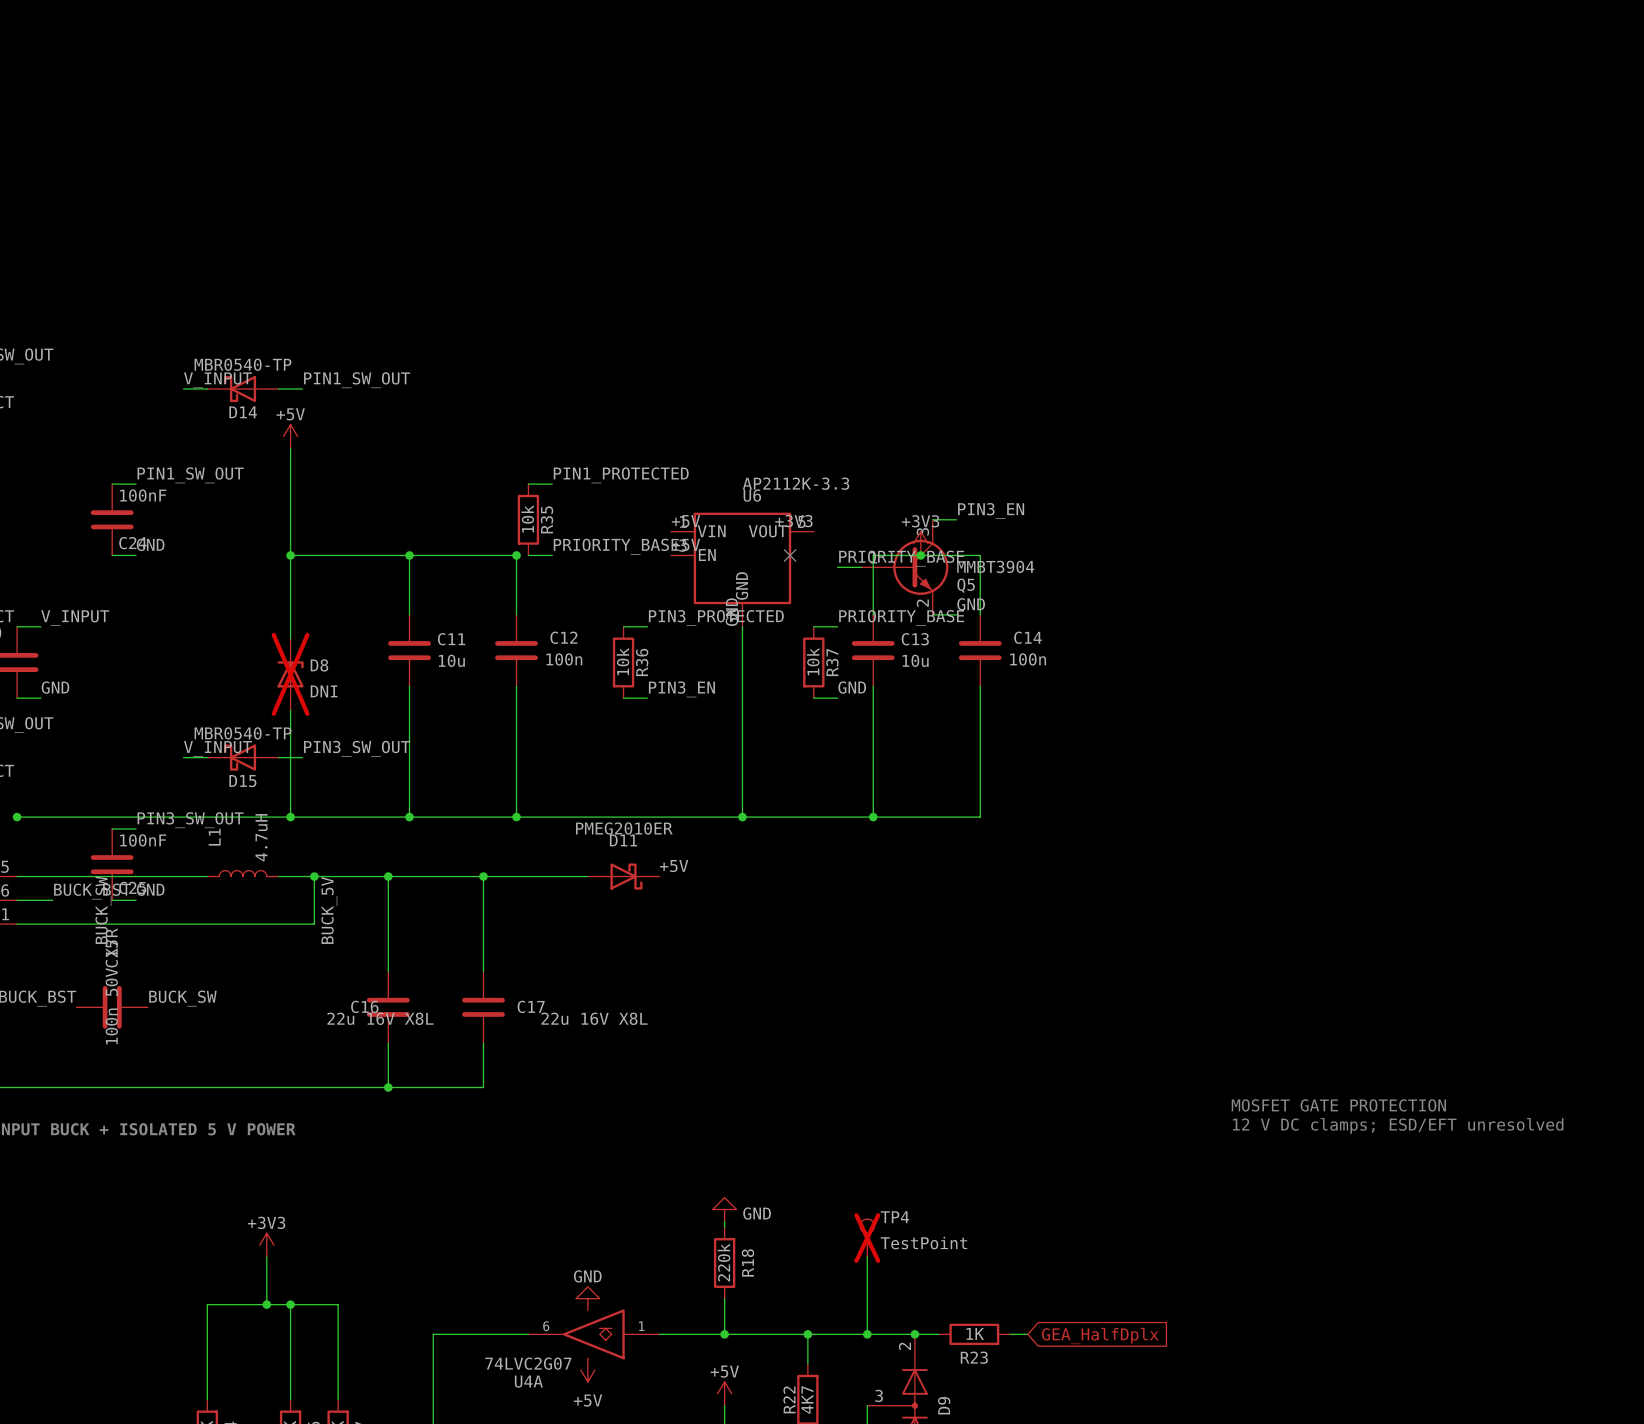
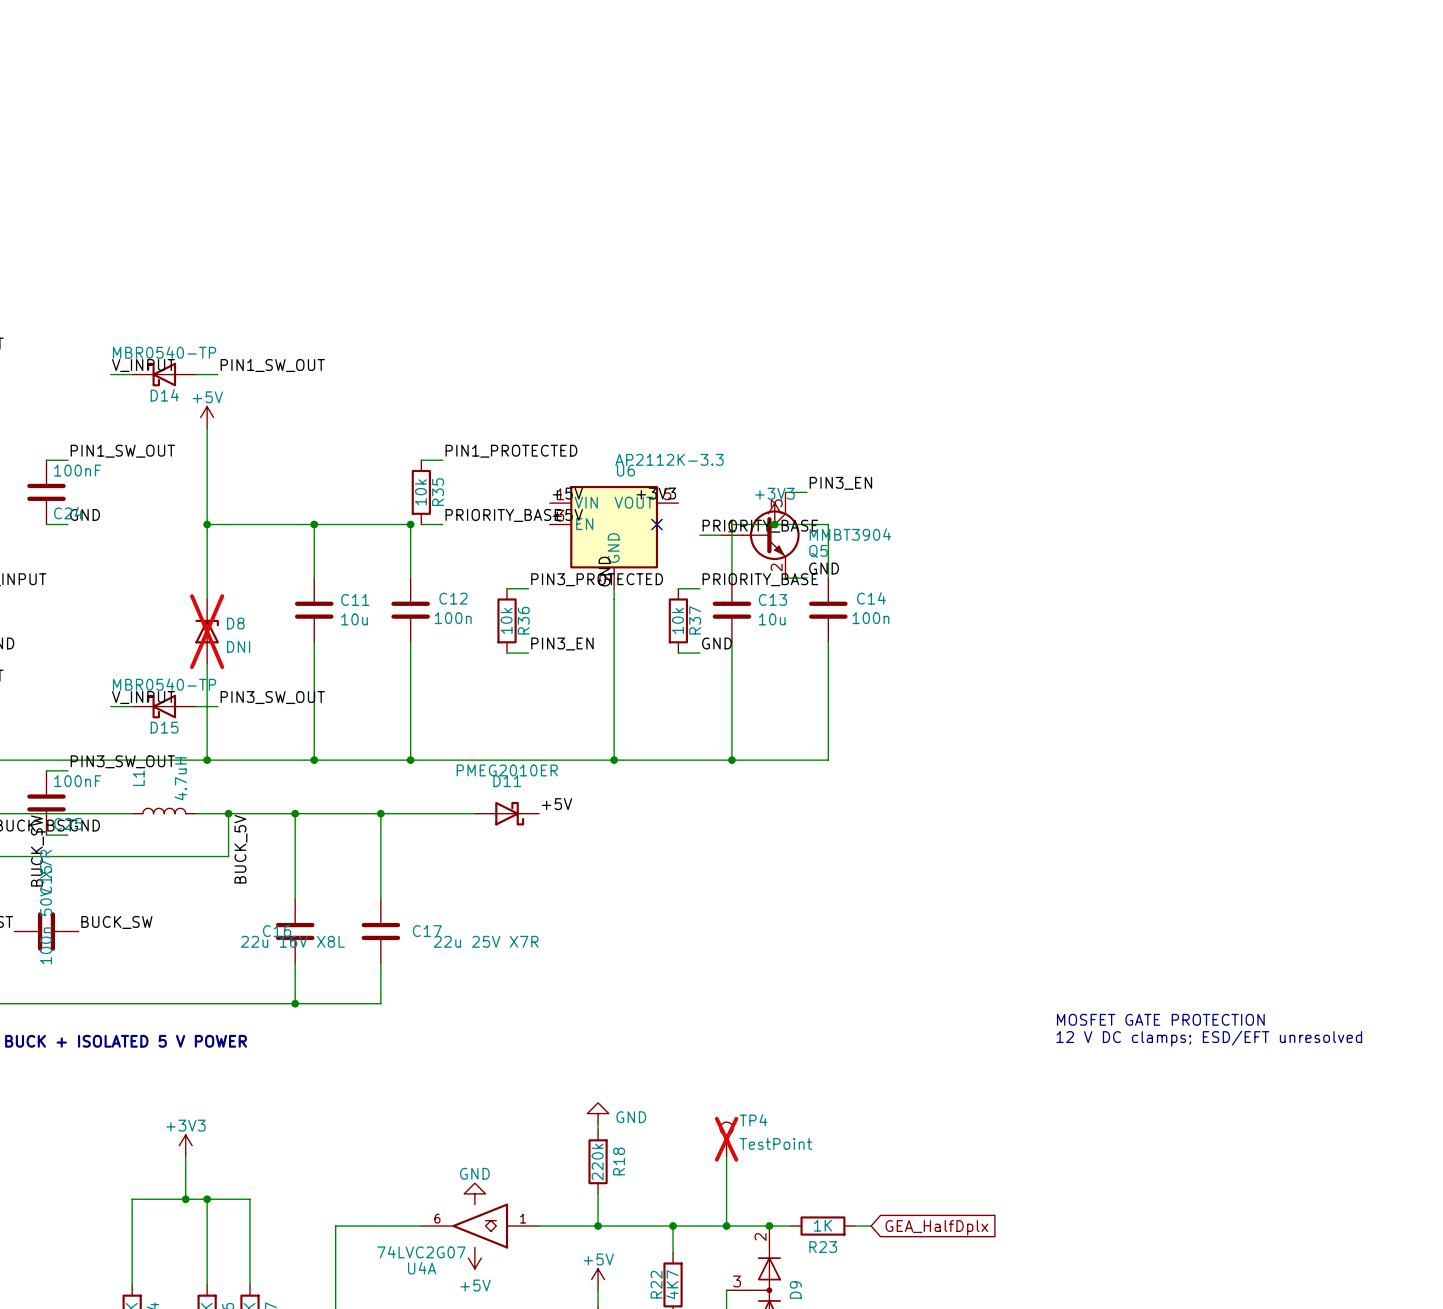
C17 value: 22u 16V X8L (594, 1018) -> 22u 25V X7R (486, 941)

